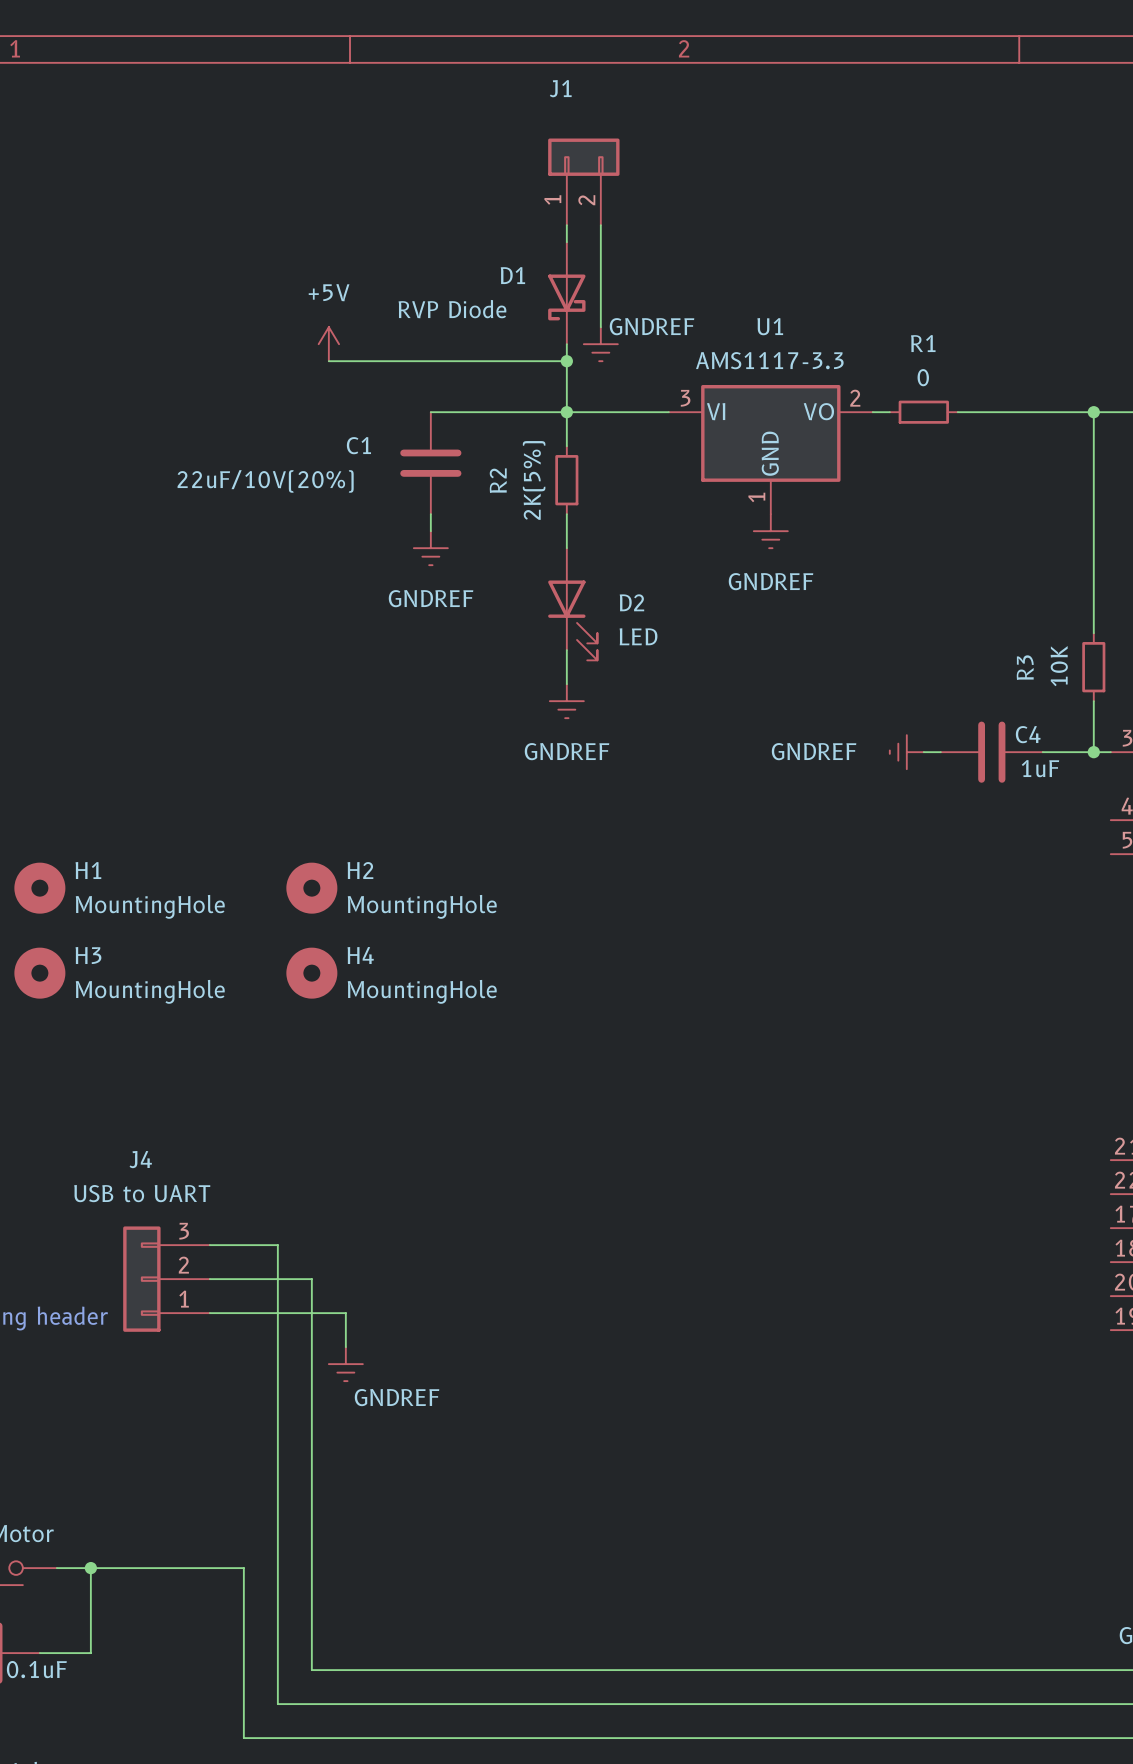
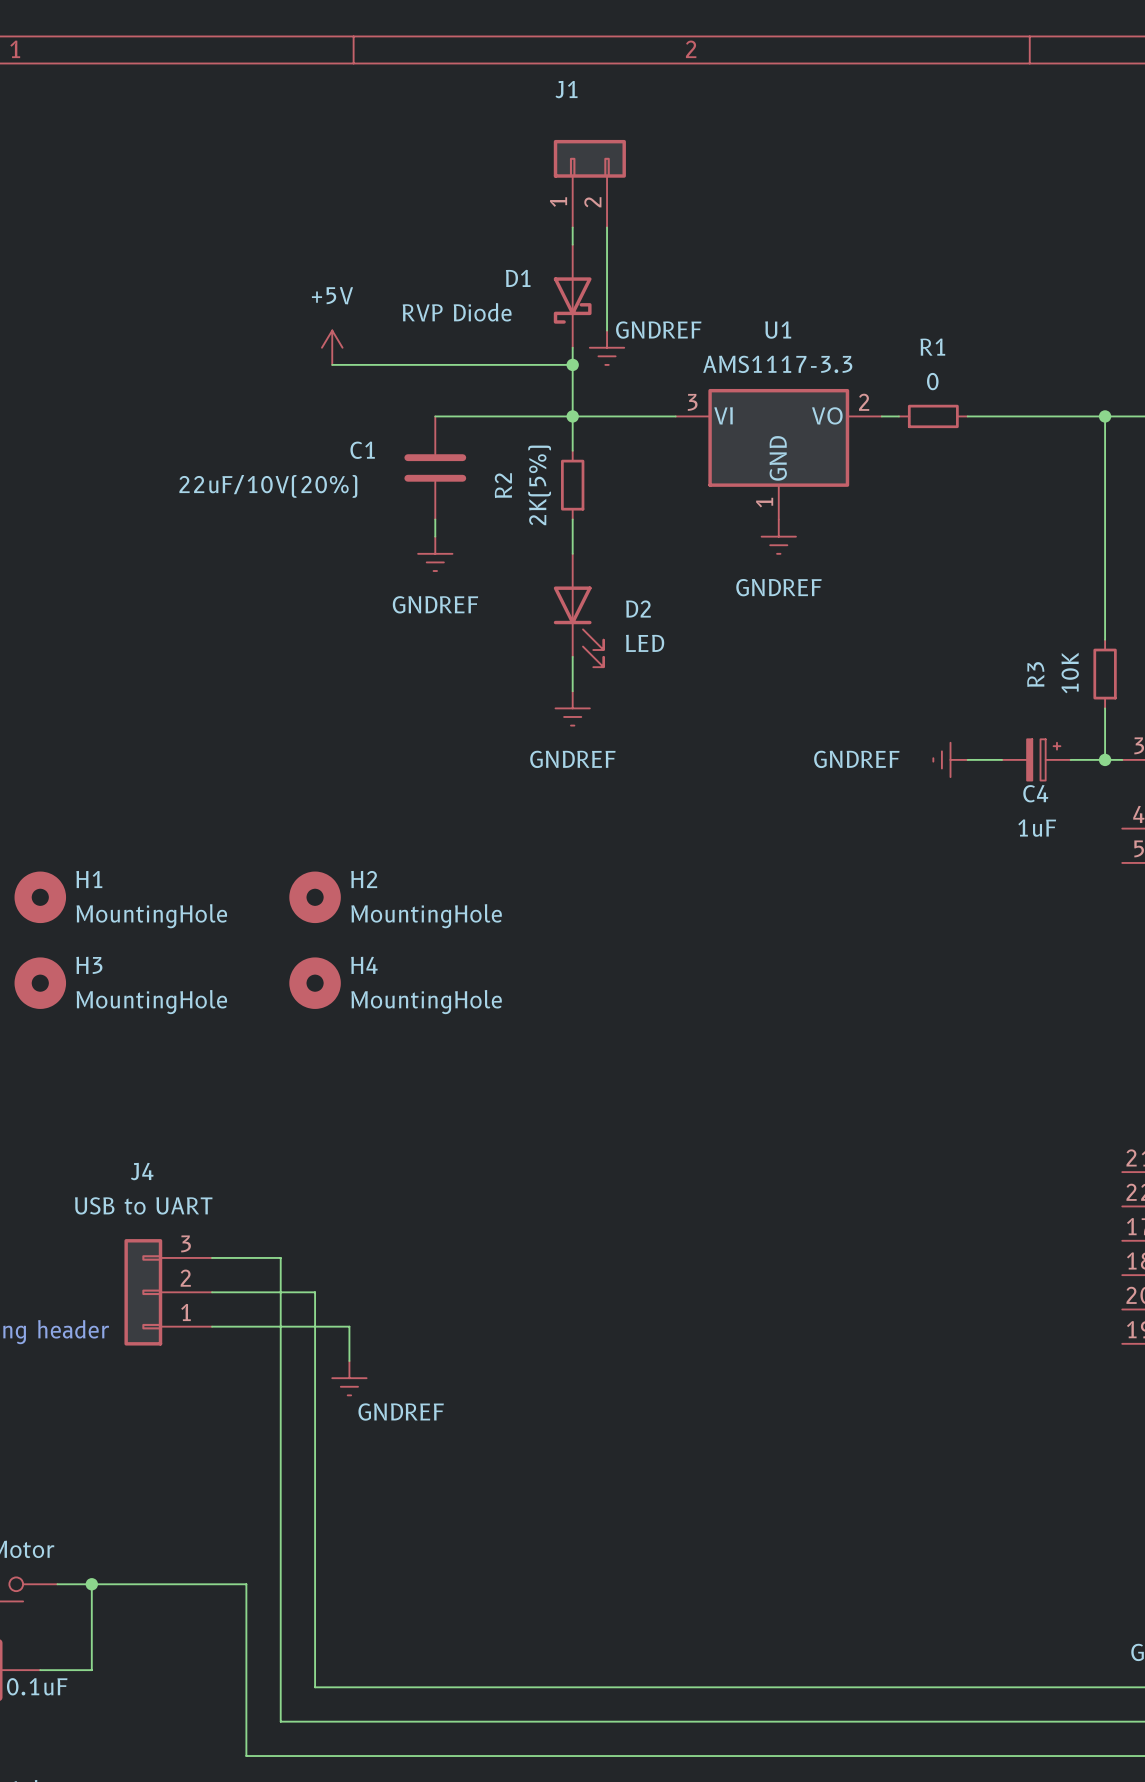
C4 symbol: [940, 721, 1043, 783] -> [1002, 739, 1071, 781]
C4 name position: C4 (1028, 734) -> C4 (1035, 793)
power symbol position: GNDREF (906, 752) -> GNDREF (950, 759)
wire: (923, 752) (940, 752) -> none
C4 value position: 1uF (1040, 768) -> 1uF (1037, 828)

